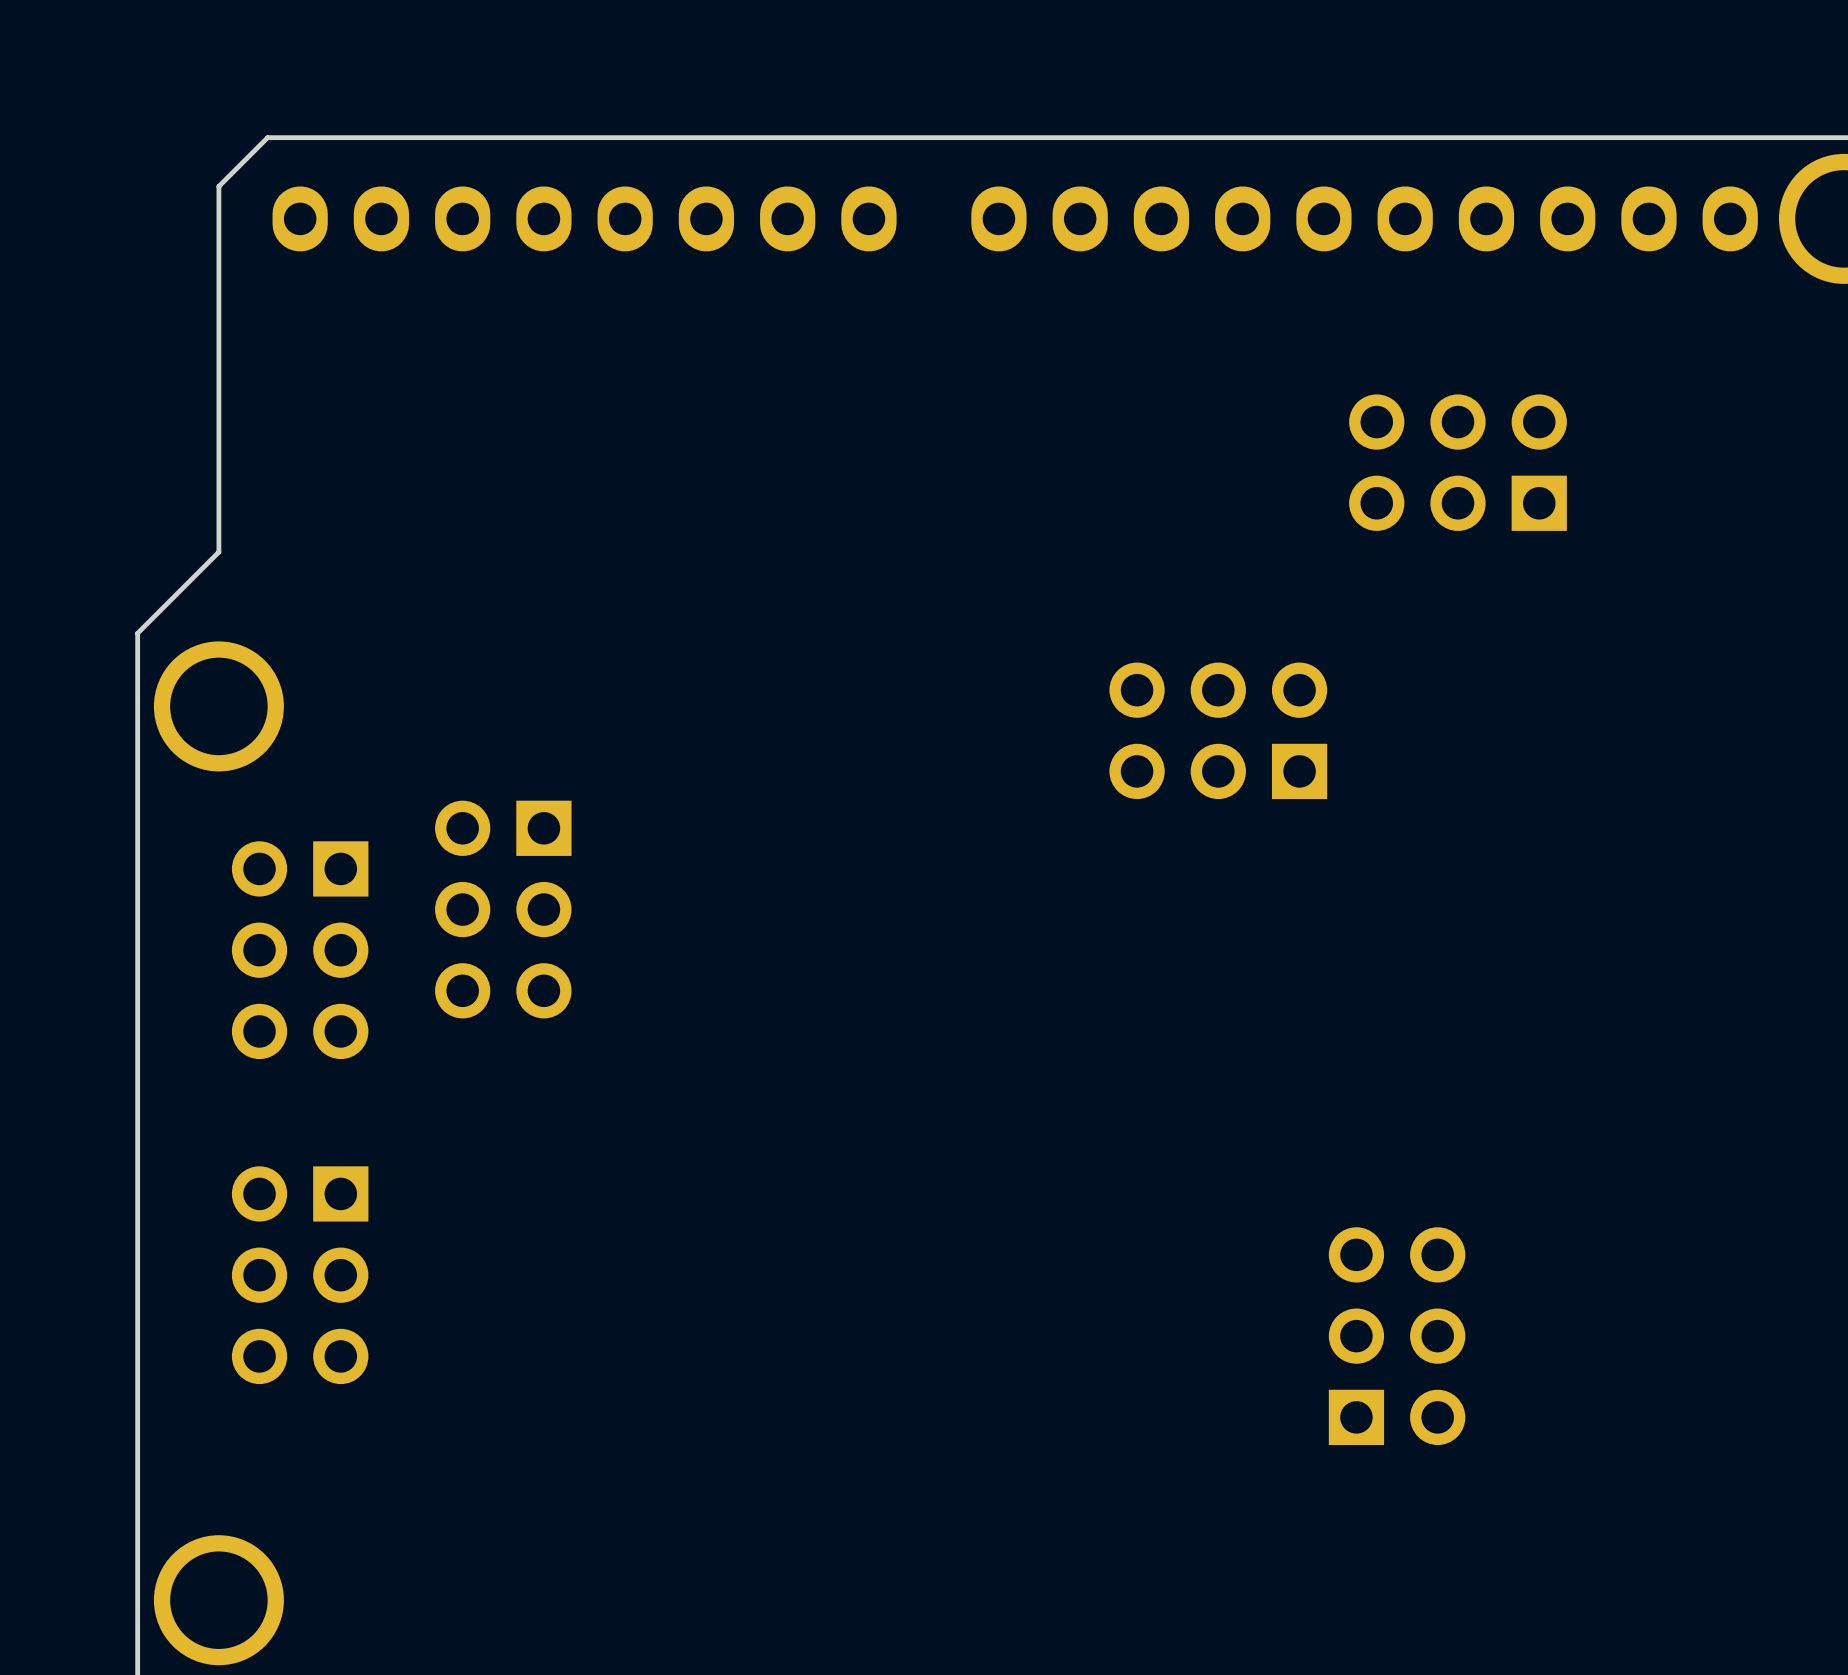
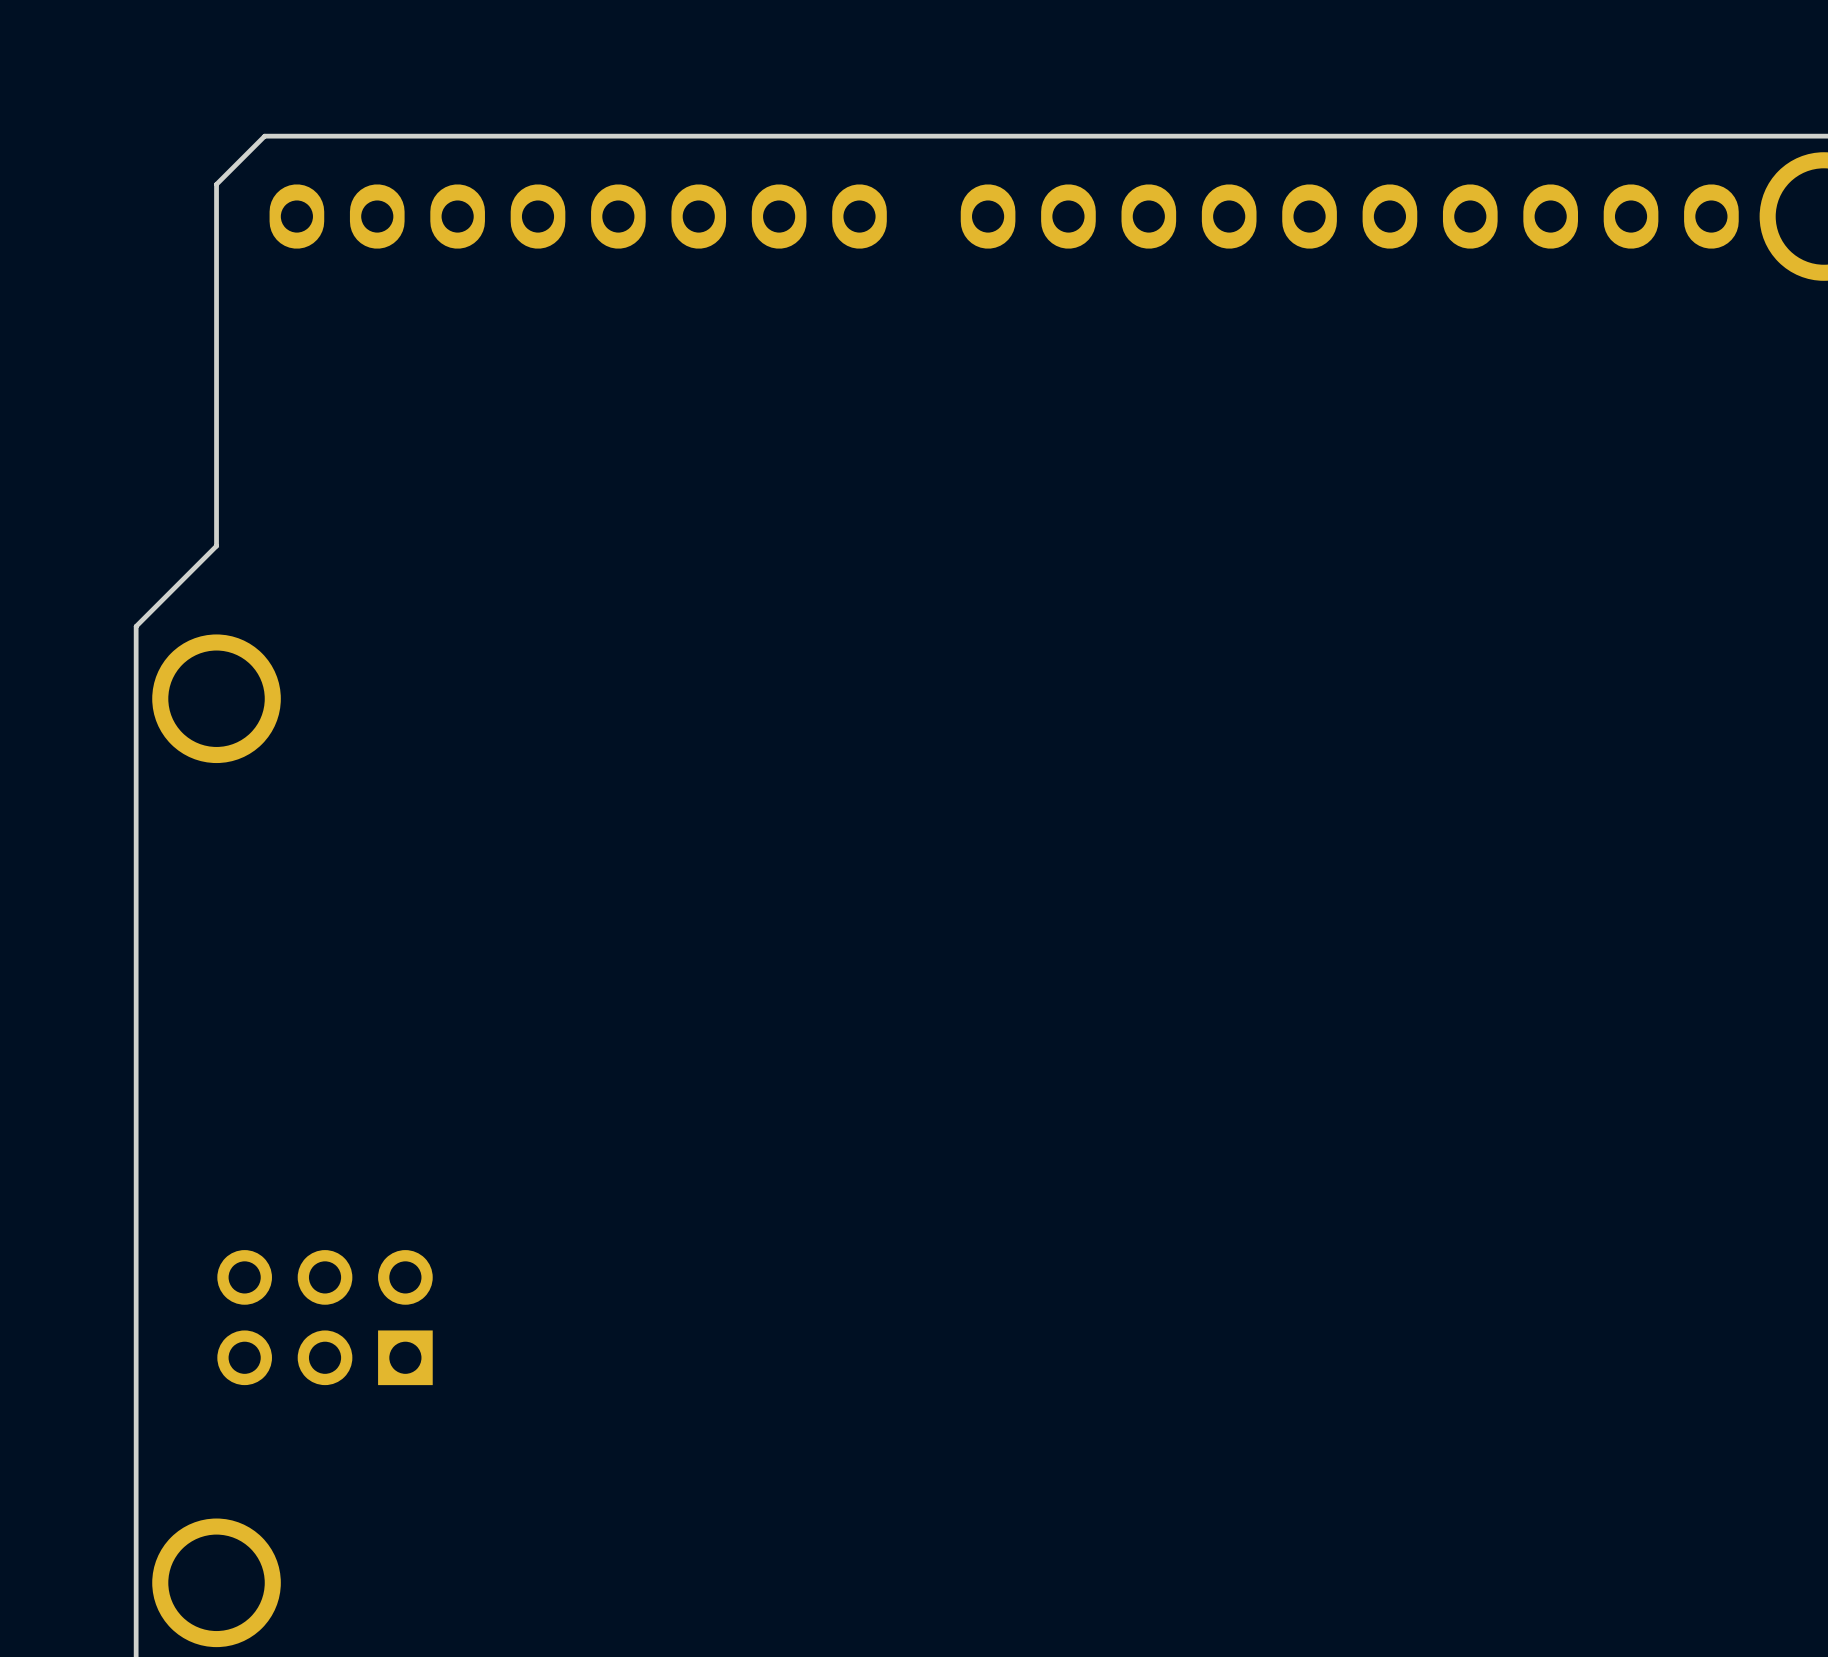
part: (1458, 462) -> none
part: (1218, 730) -> none
part: (503, 909) -> none
part: (300, 950) -> none
part rotation: 0° (300, 1275) -> 90° clockwise (325, 1317)
part: (1397, 1336) -> none

